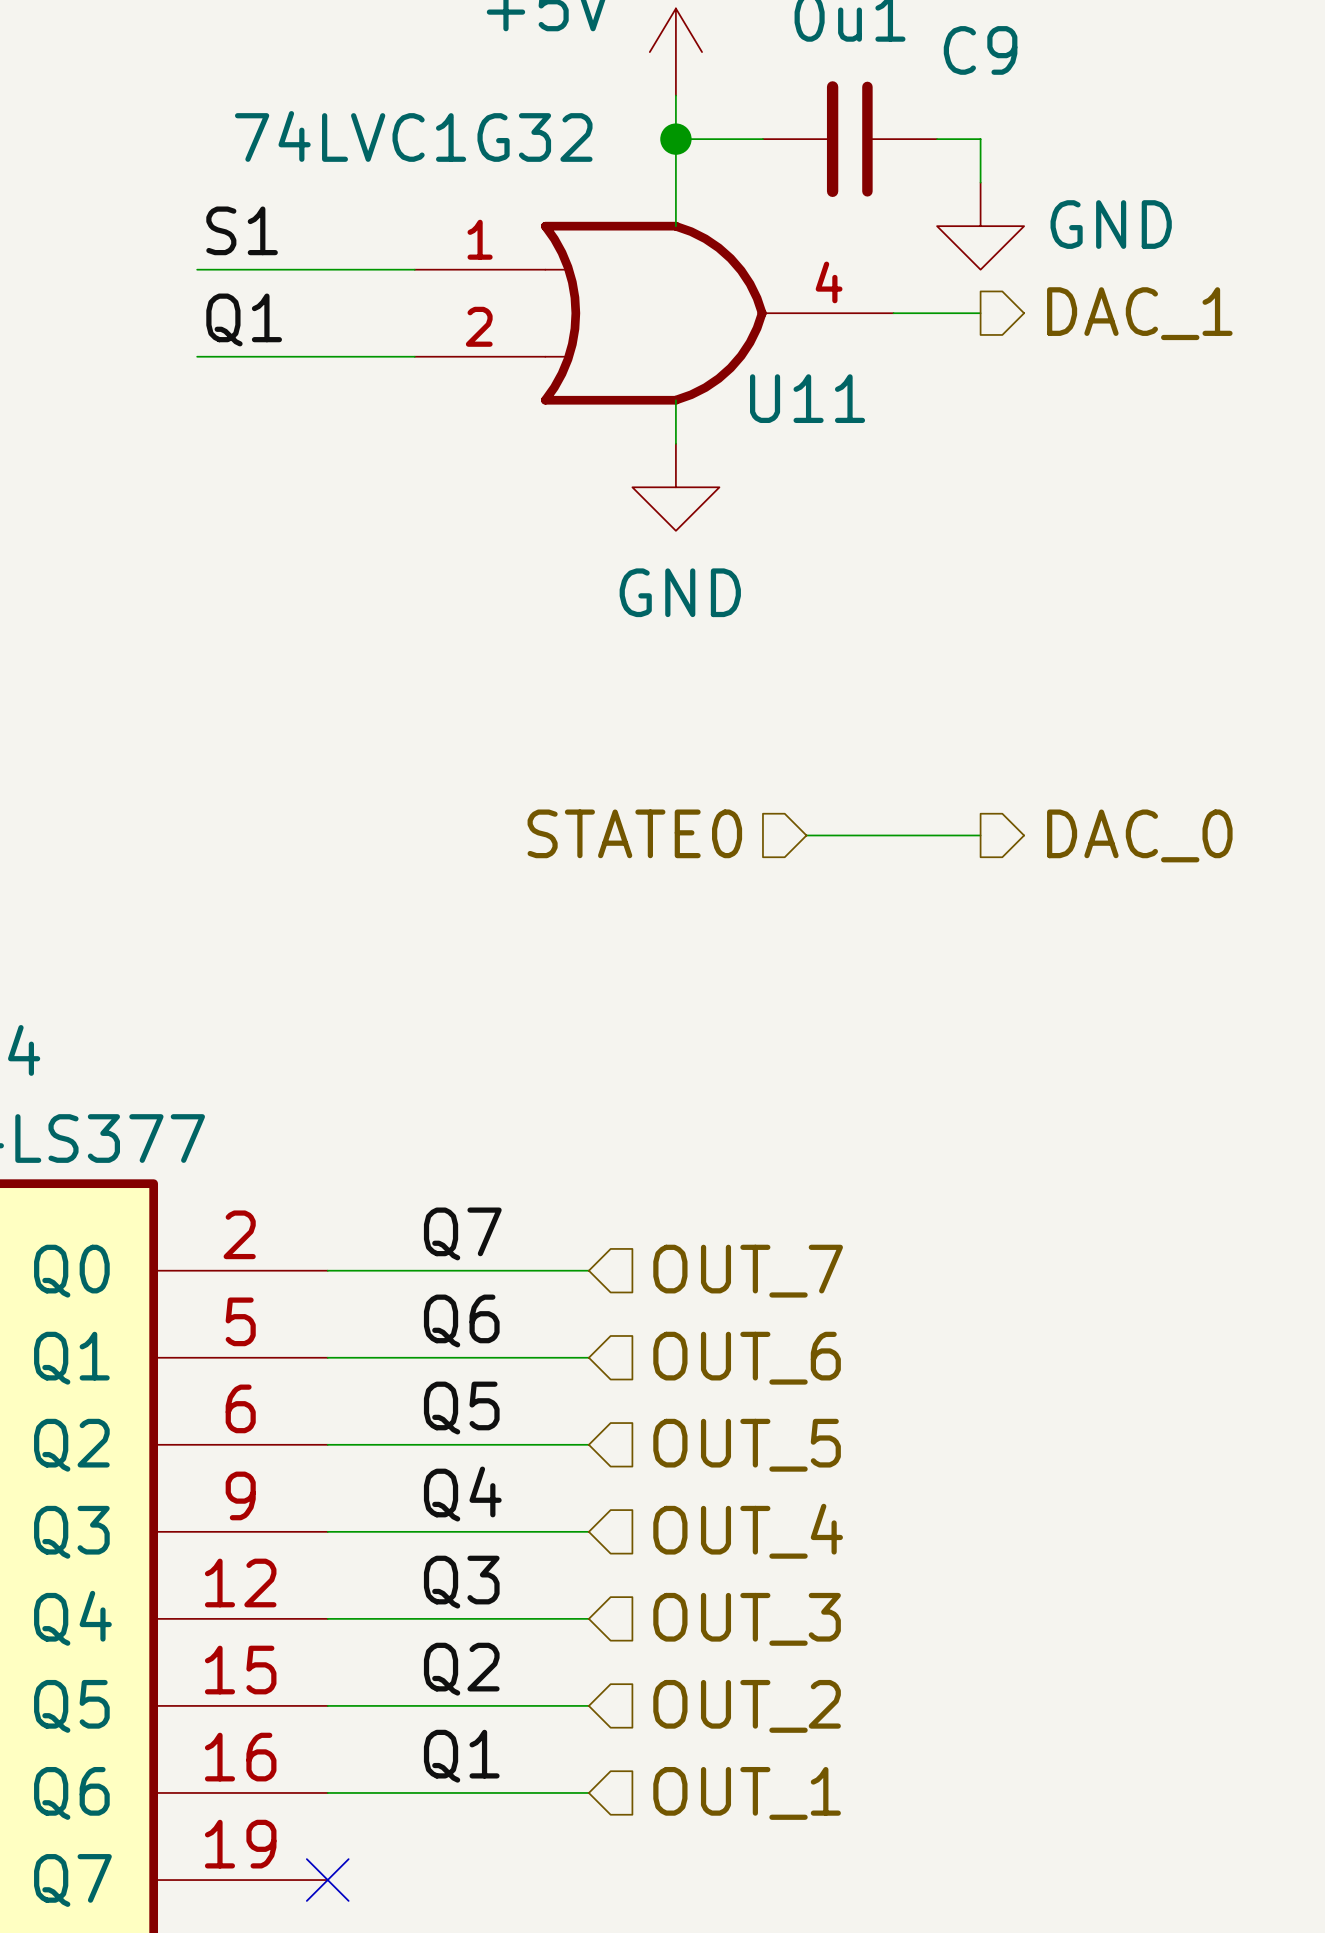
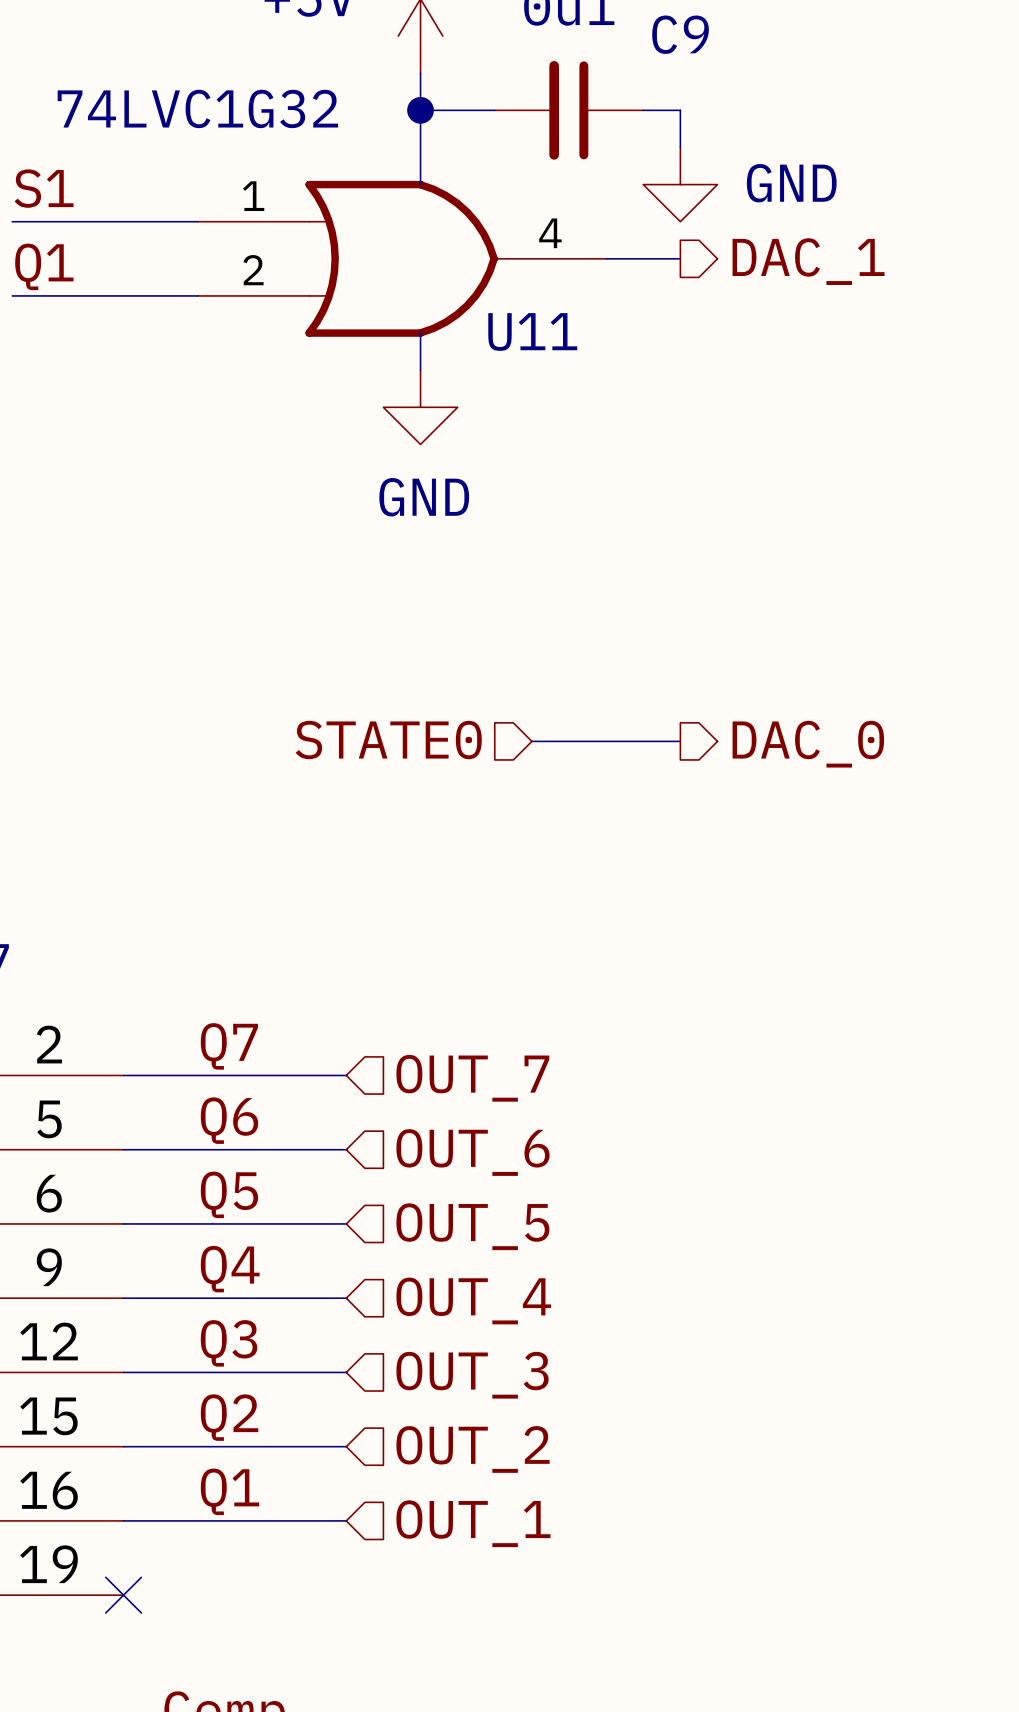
hierarchical label position: STATE0 (634, 833) -> STATE0 (388, 740)
wire: (806, 835) (980, 835) -> (531, 741) (680, 741)
hierarchical label position: DAC_0 (1139, 835) -> DAC_0 (808, 744)

